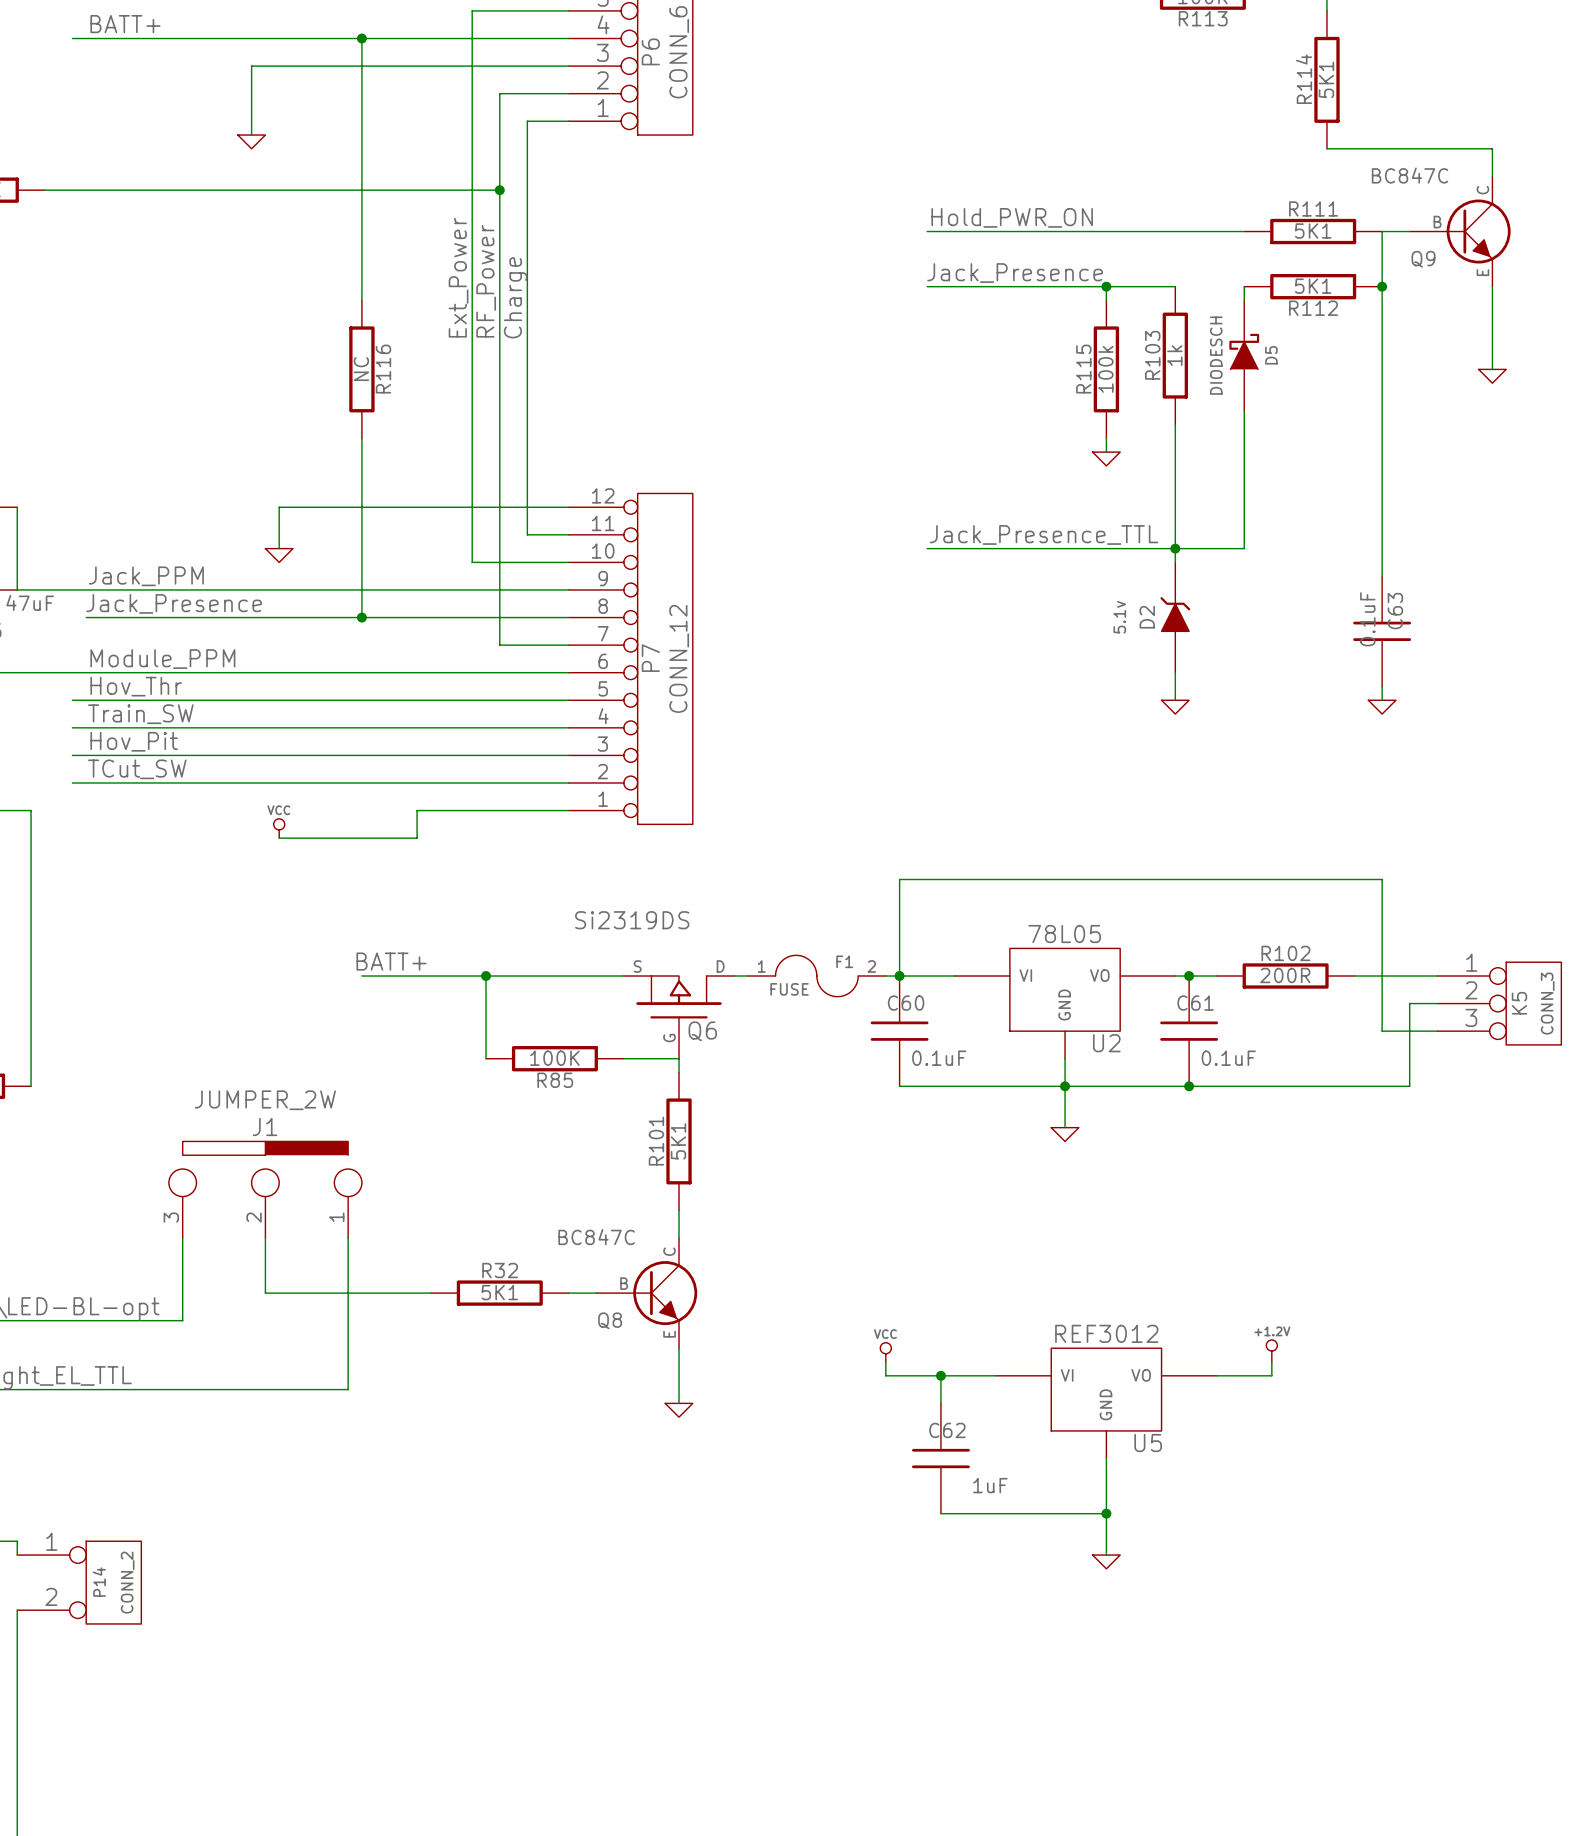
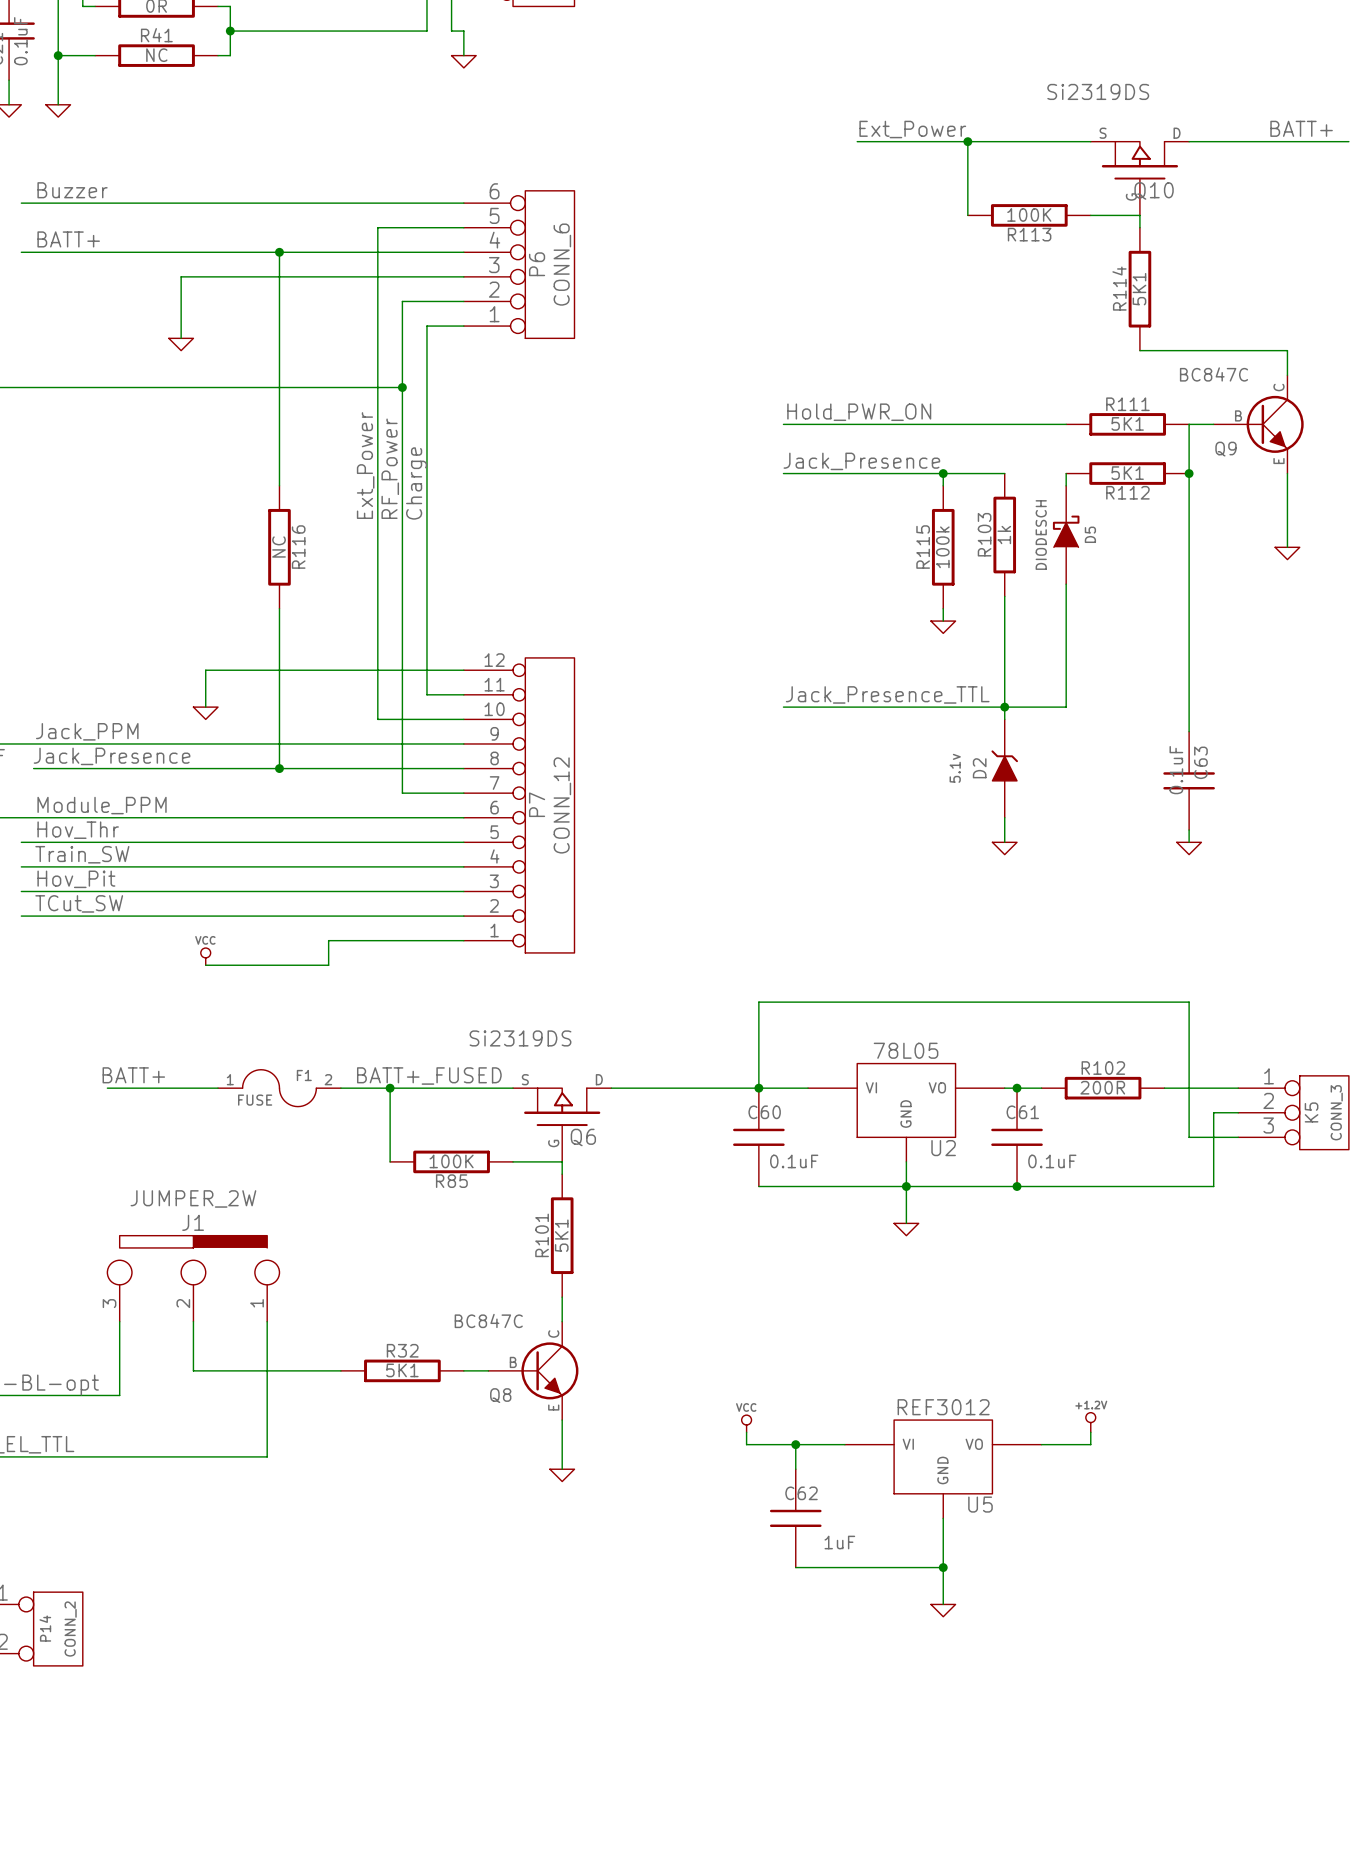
label position: BATT+ (391, 961) -> BATT+ (133, 1075)
label: none -> BATT+_FUSED (429, 1076)
wire: none -> (107, 1088) (218, 1088)
wire: (361, 976) (430, 976) -> none
wire: none -> (623, 1088) (746, 1088)
F1 position: (816, 976) -> (279, 1088)

